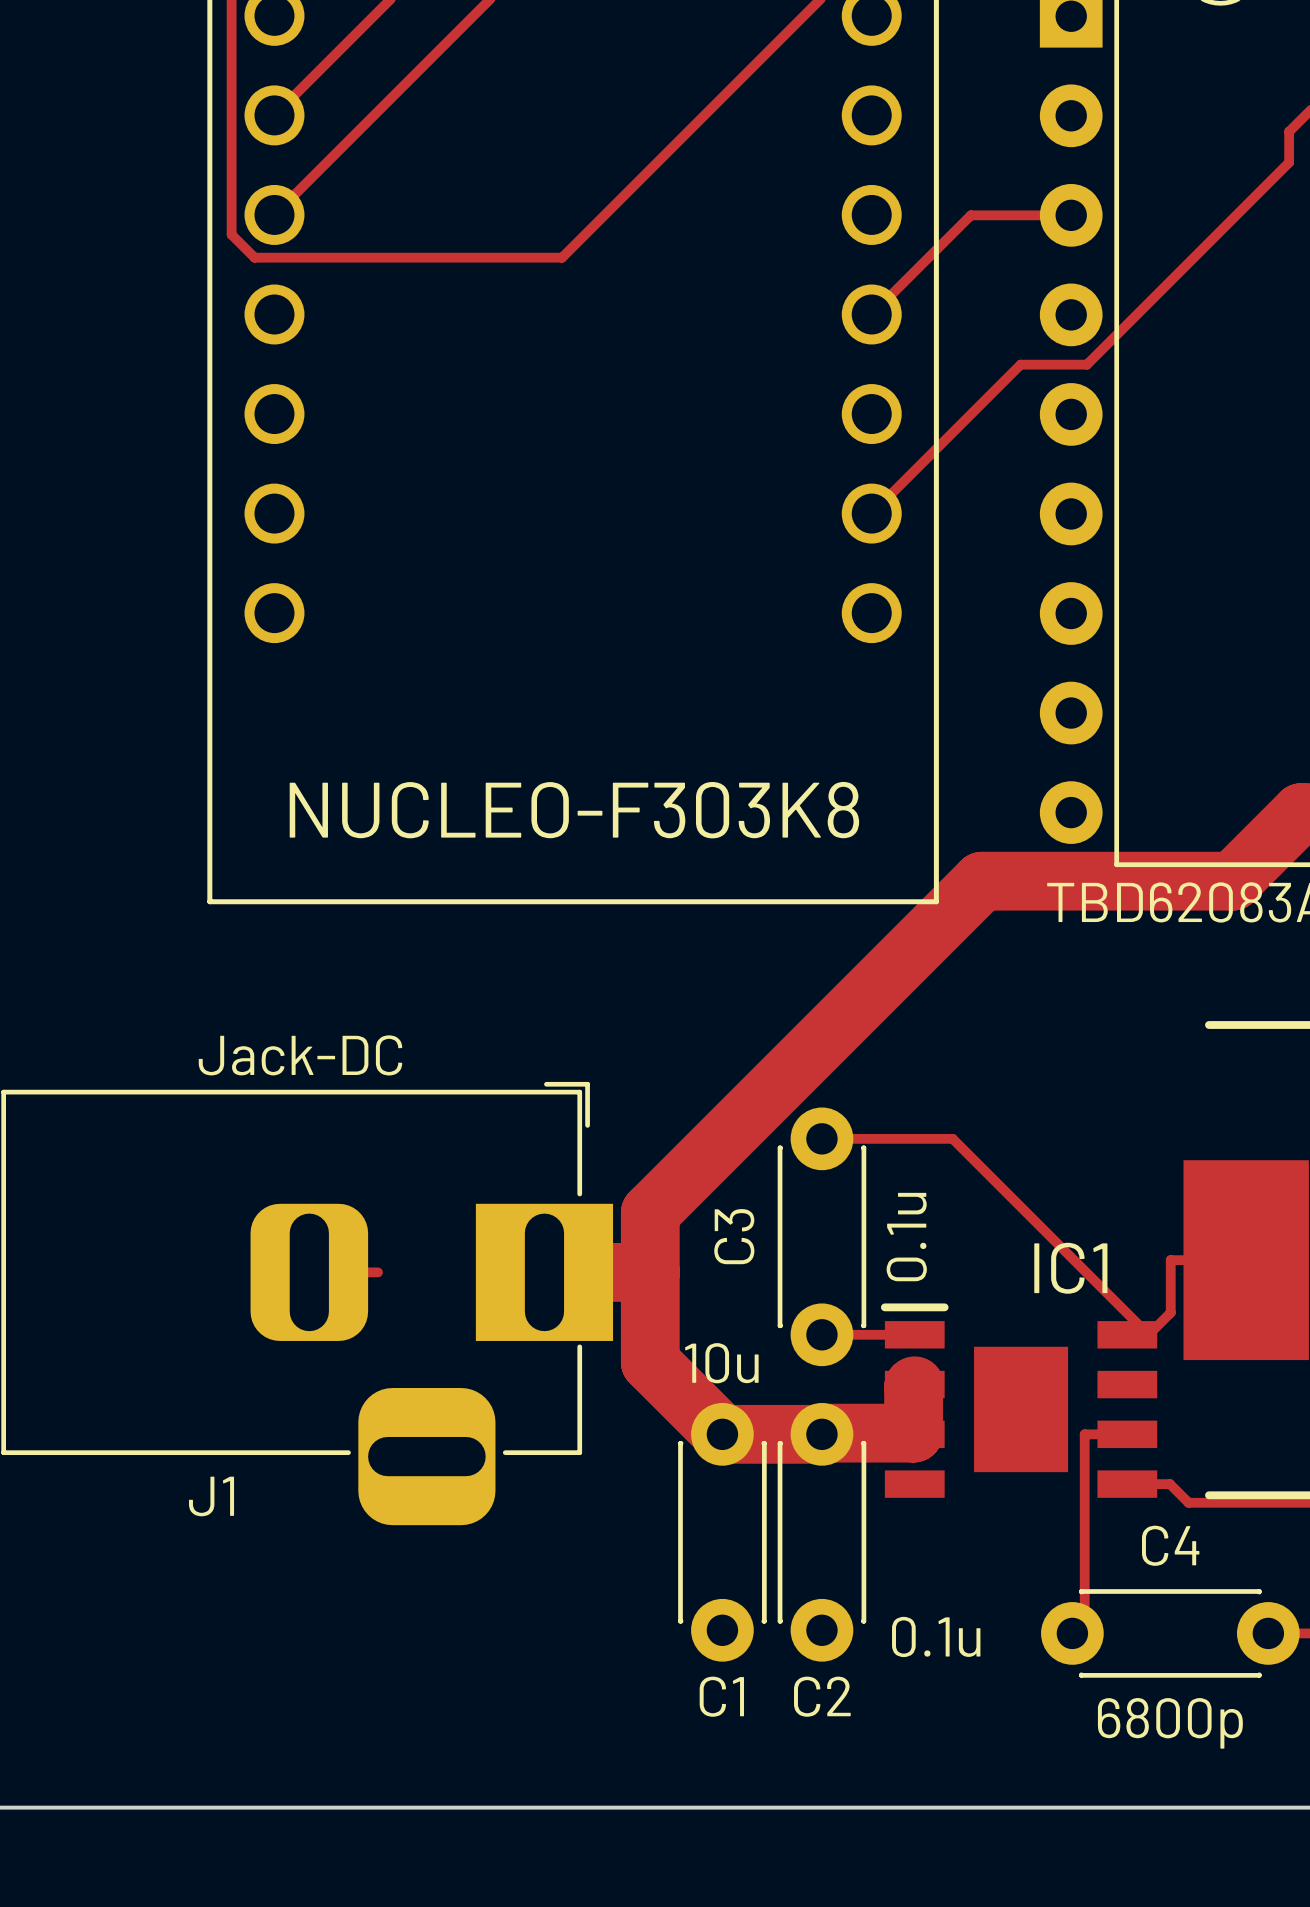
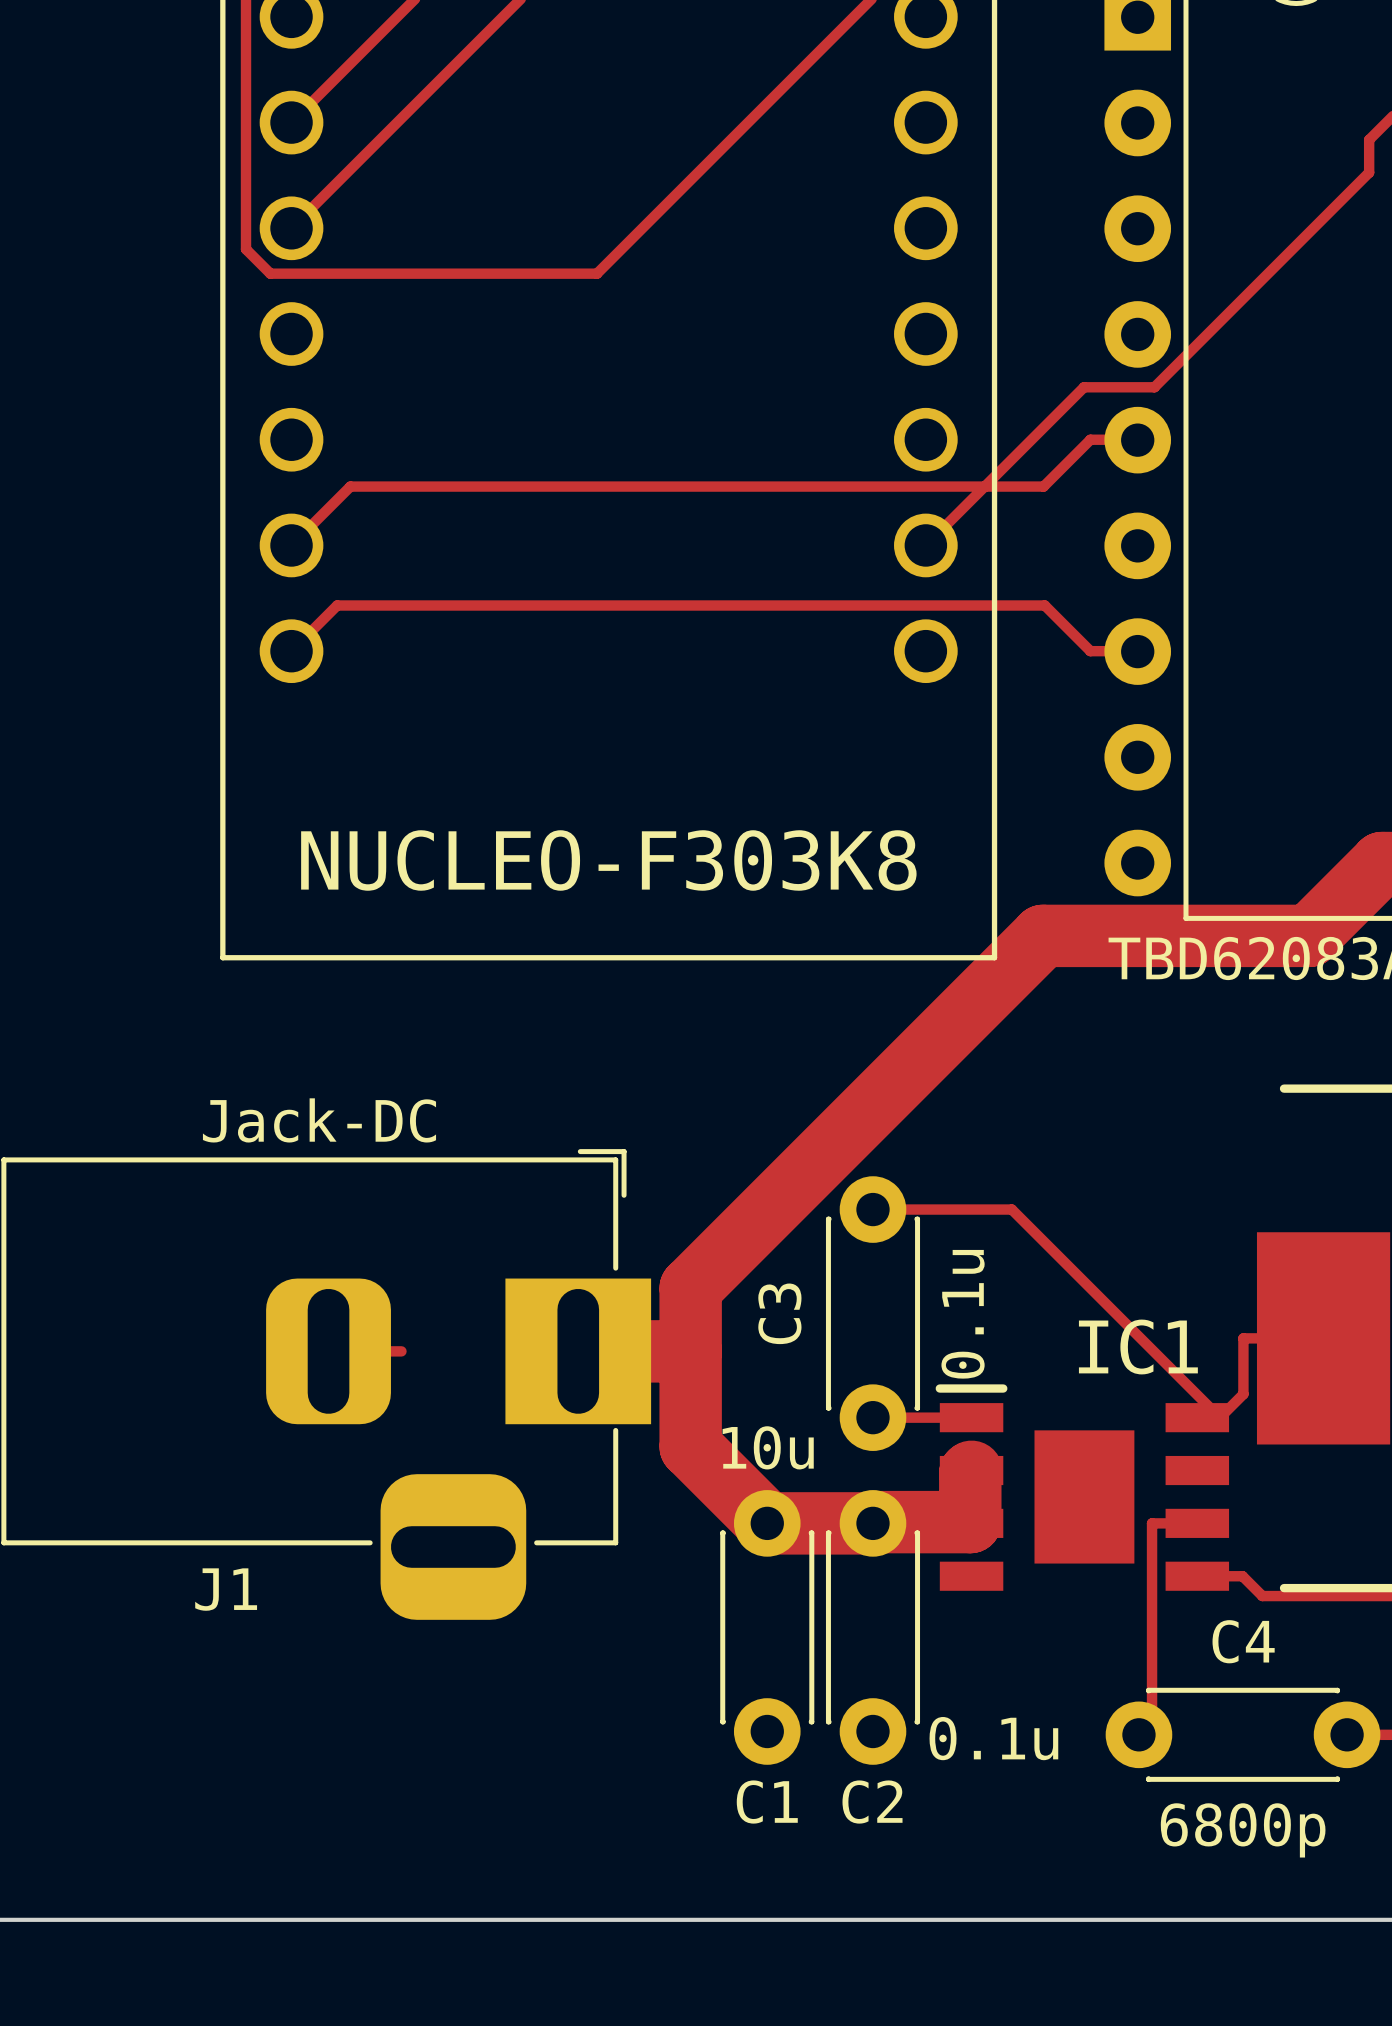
track: (1071, 215) (970, 215) (871, 314) -> none
track: none -> (1137, 439) (1090, 439) (1043, 486) (350, 486) (291, 545)
track: none -> (291, 651) (337, 605) (1044, 605) (1090, 651) (1137, 651)

